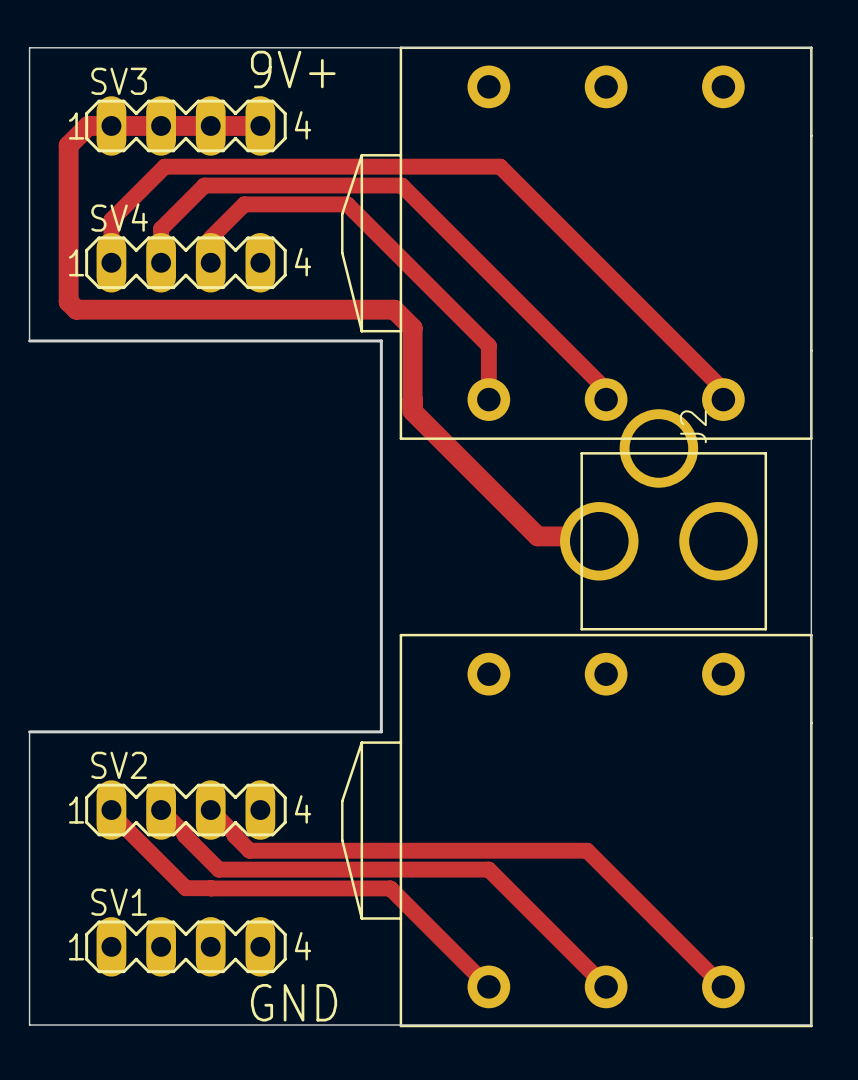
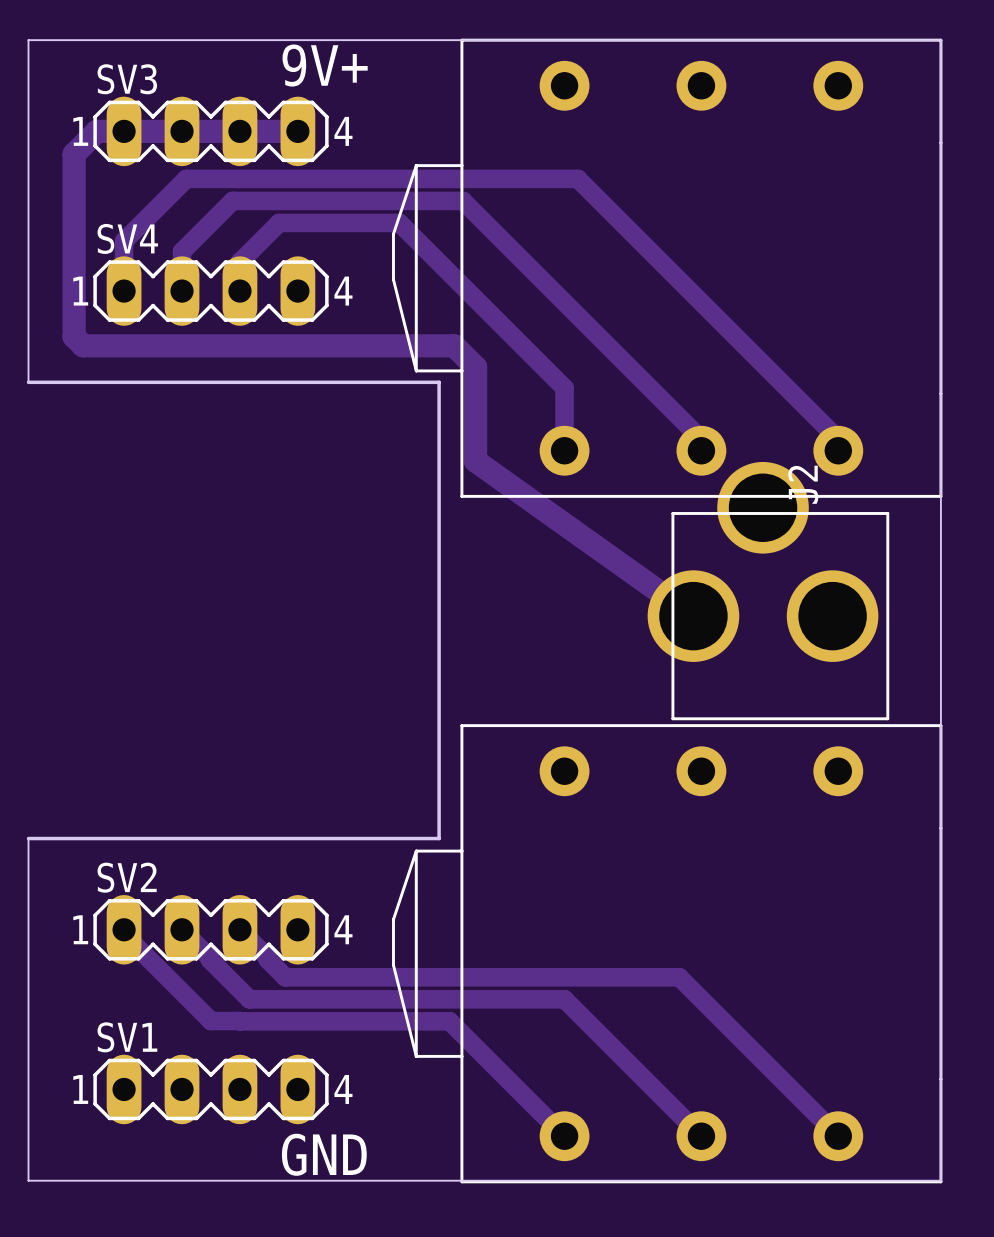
track: (412, 408) (412, 411) (537, 536) (594, 536) (599, 541) -> (475, 461) (693, 616)

